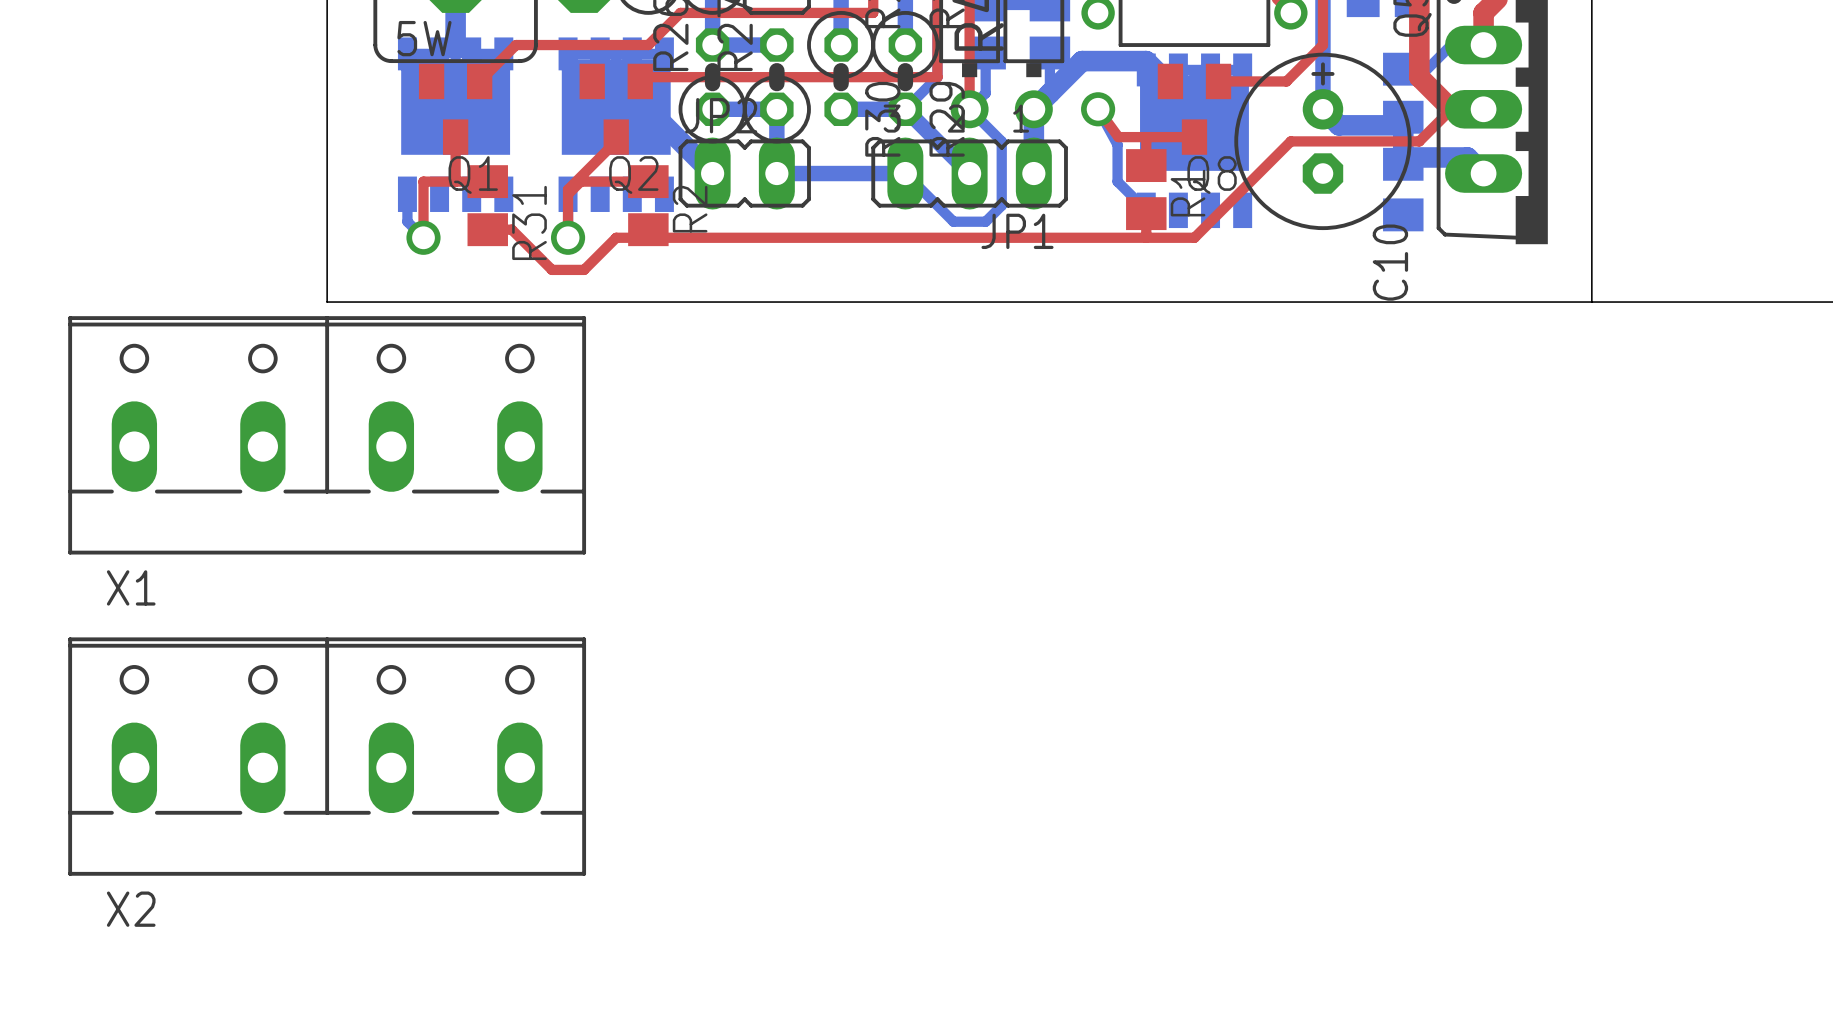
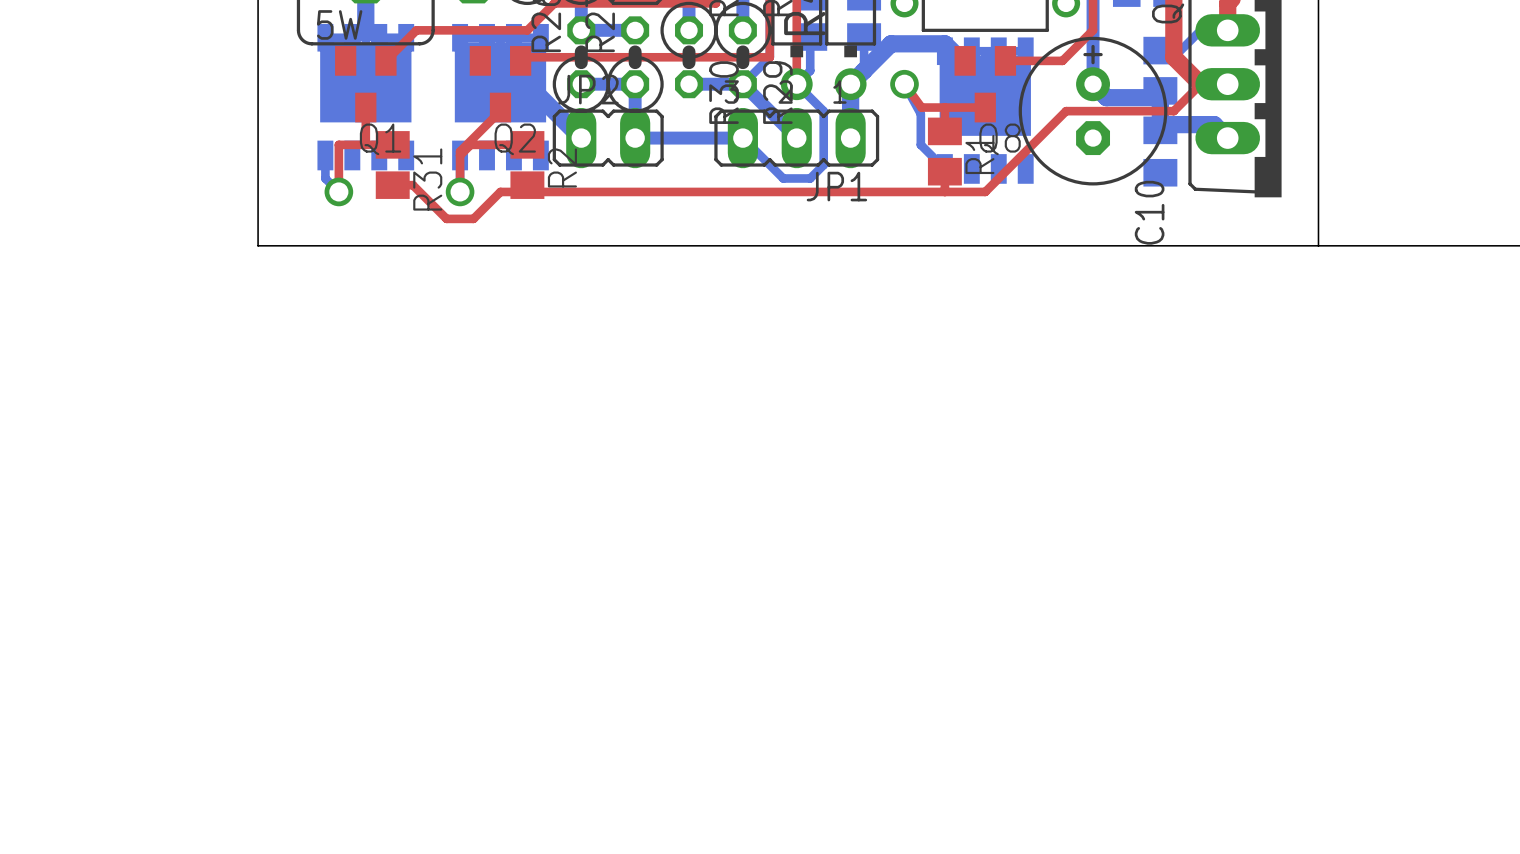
X1: (327, 435) -> none
X2: (327, 756) -> none

